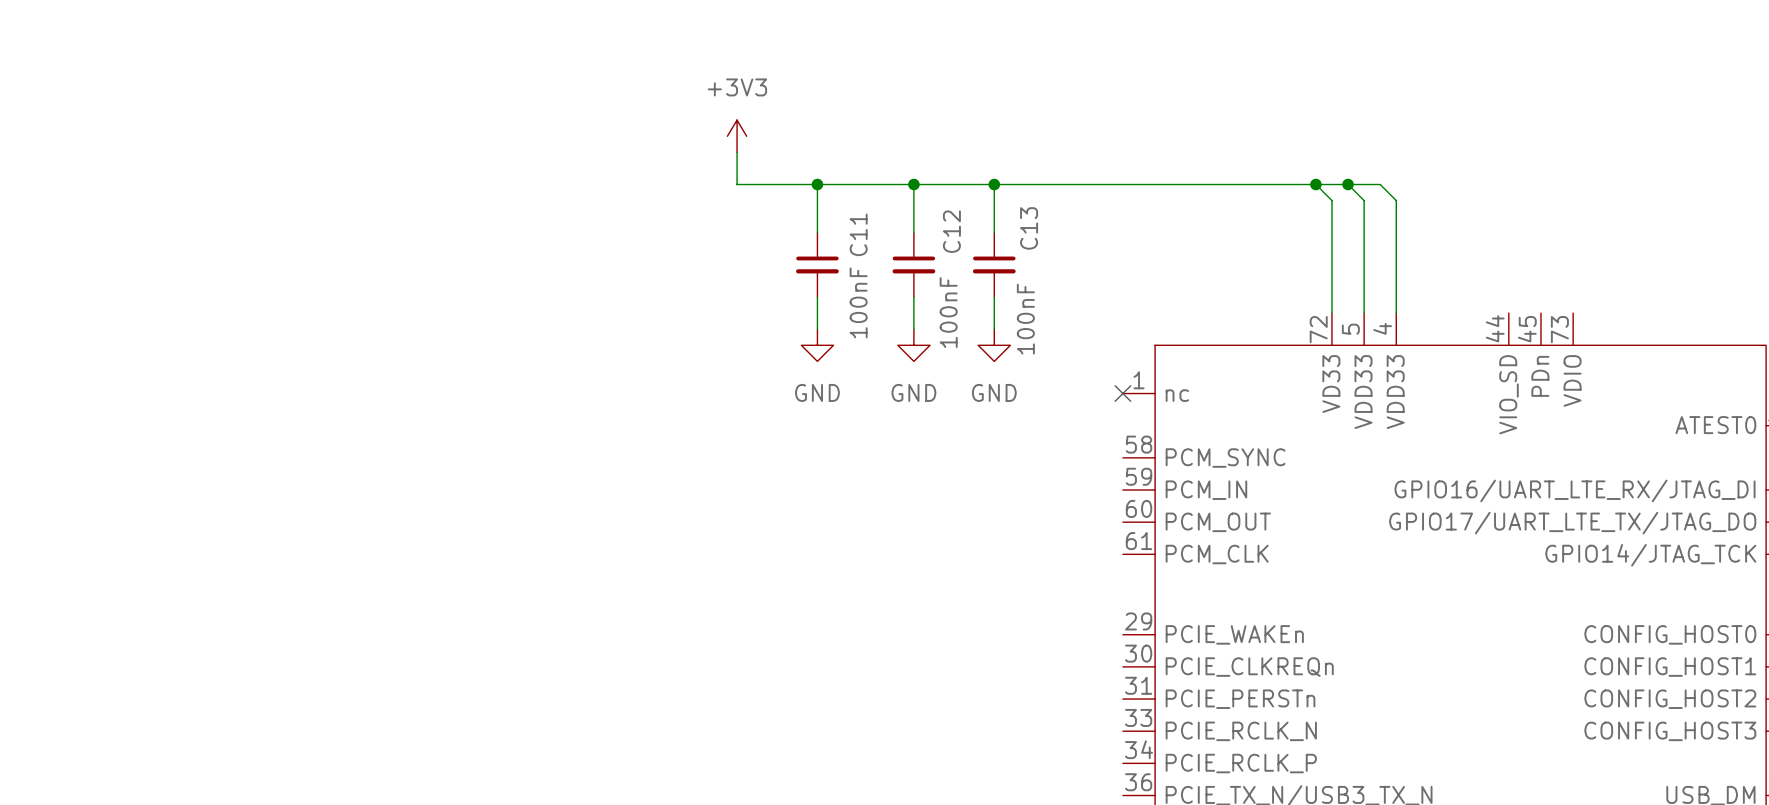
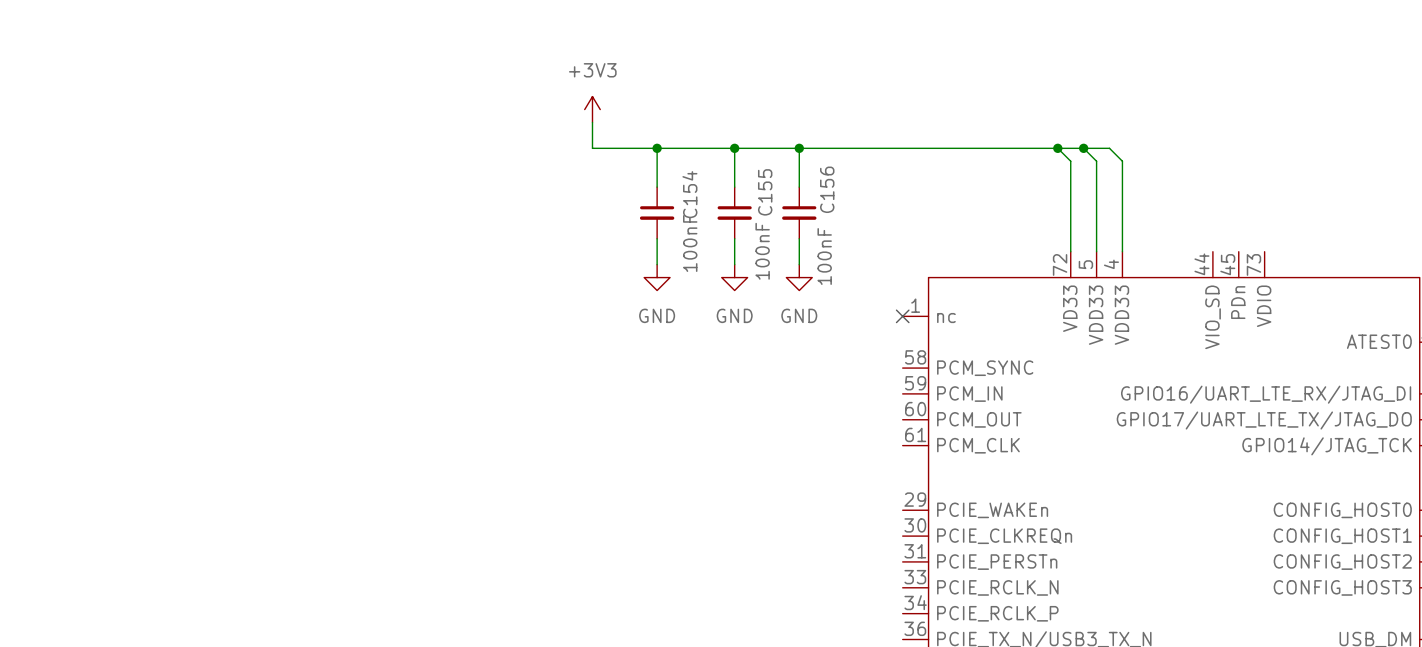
C13 name: C13 (1029, 228) -> C156 (827, 189)
C12 name: C12 (951, 231) -> C155 (765, 192)
C11 name: C11 (858, 234) -> C154 (689, 194)

